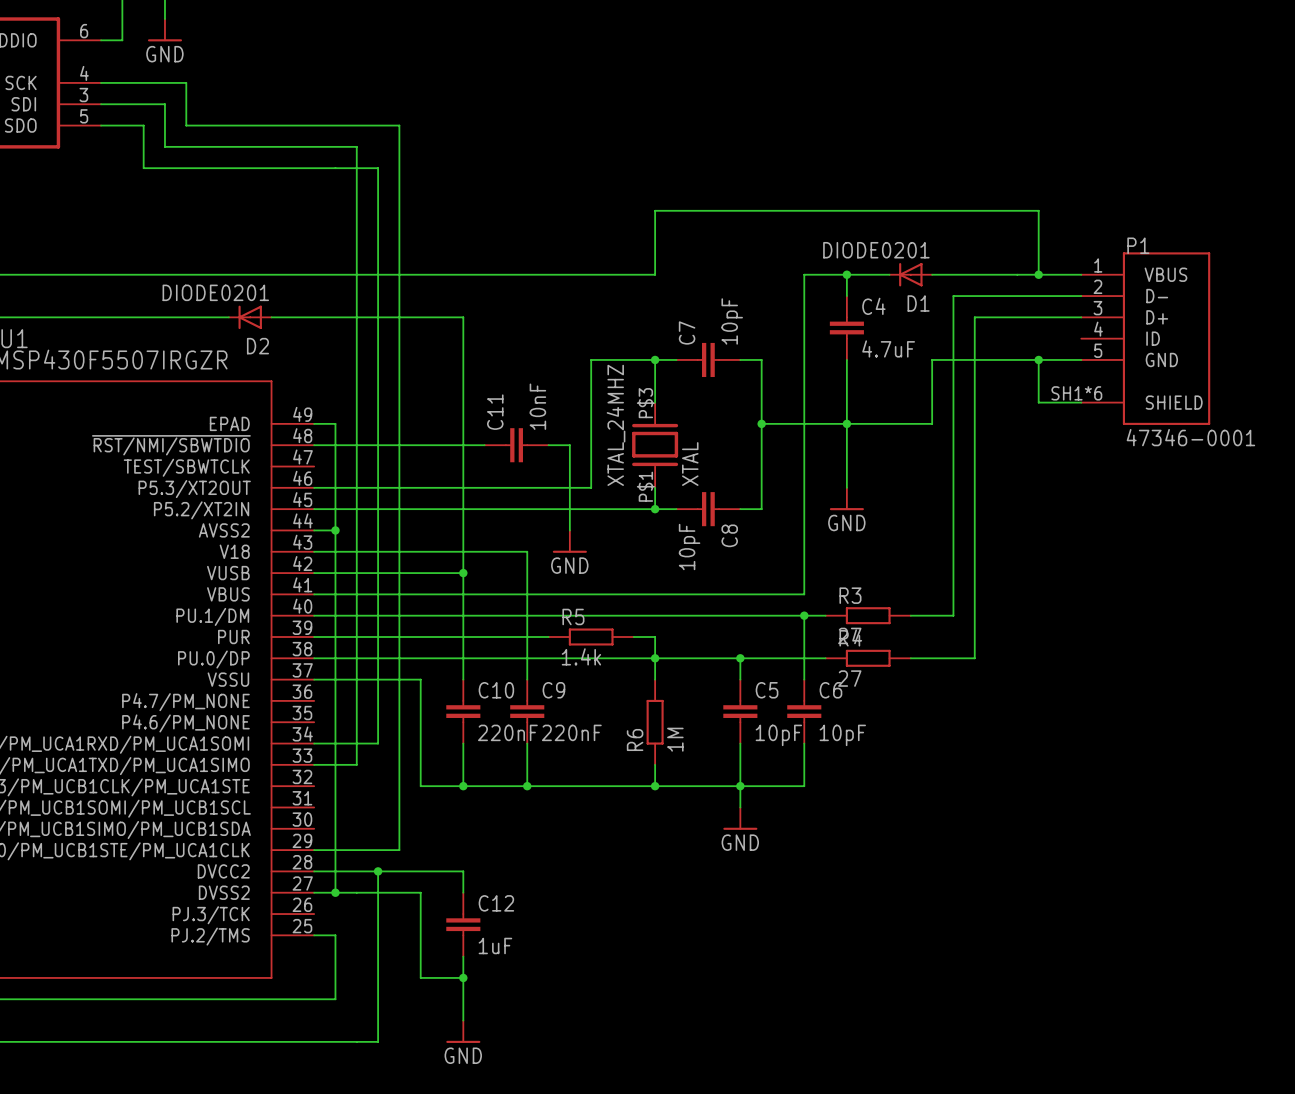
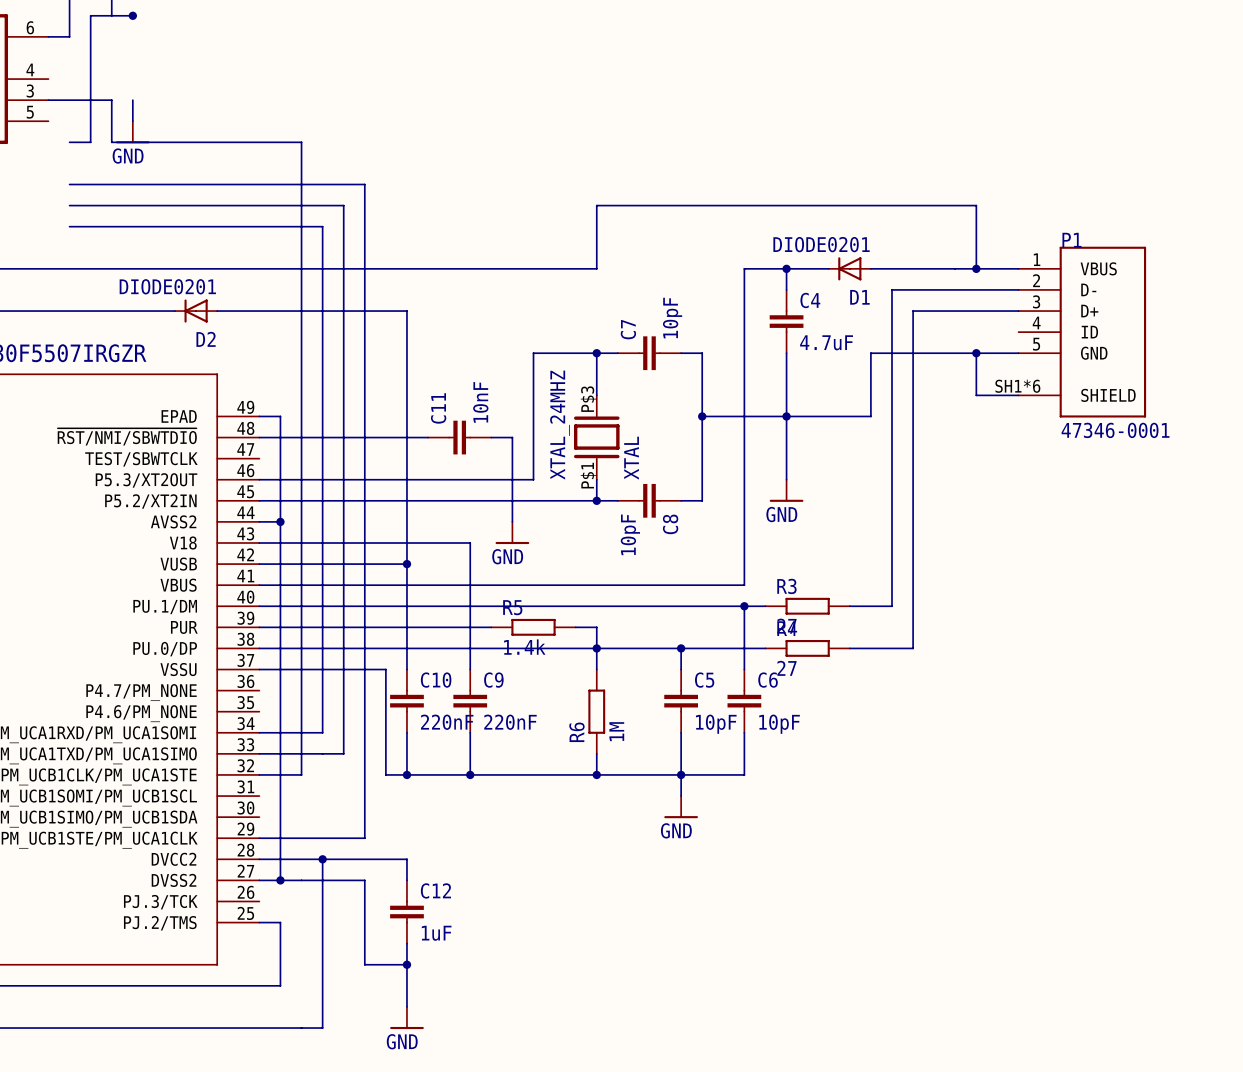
junction: none -> (132, 15)
power symbol position: GND (164, 30) -> GND (132, 132)
wire: (101, 82) (186, 82) (186, 104) -> none
wire: (101, 125) (143, 125) -> (132, 15) (90, 15) (90, 121)
wire: (186, 125) (399, 125) (399, 210) -> (69, 205) (343, 205)
wire: none -> (69, 142) (90, 142)
wire: (143, 146) (143, 168) (378, 168) (378, 232) -> (69, 226) (322, 226)
wire: (399, 764) (399, 850) -> (364, 774) (364, 838) (343, 838)
wire: none -> (343, 753) (301, 753) (301, 774) (259, 774)
wire: (420, 786) (442, 786) -> (69, 184) (364, 184) (364, 669) (385, 669) (385, 774)

